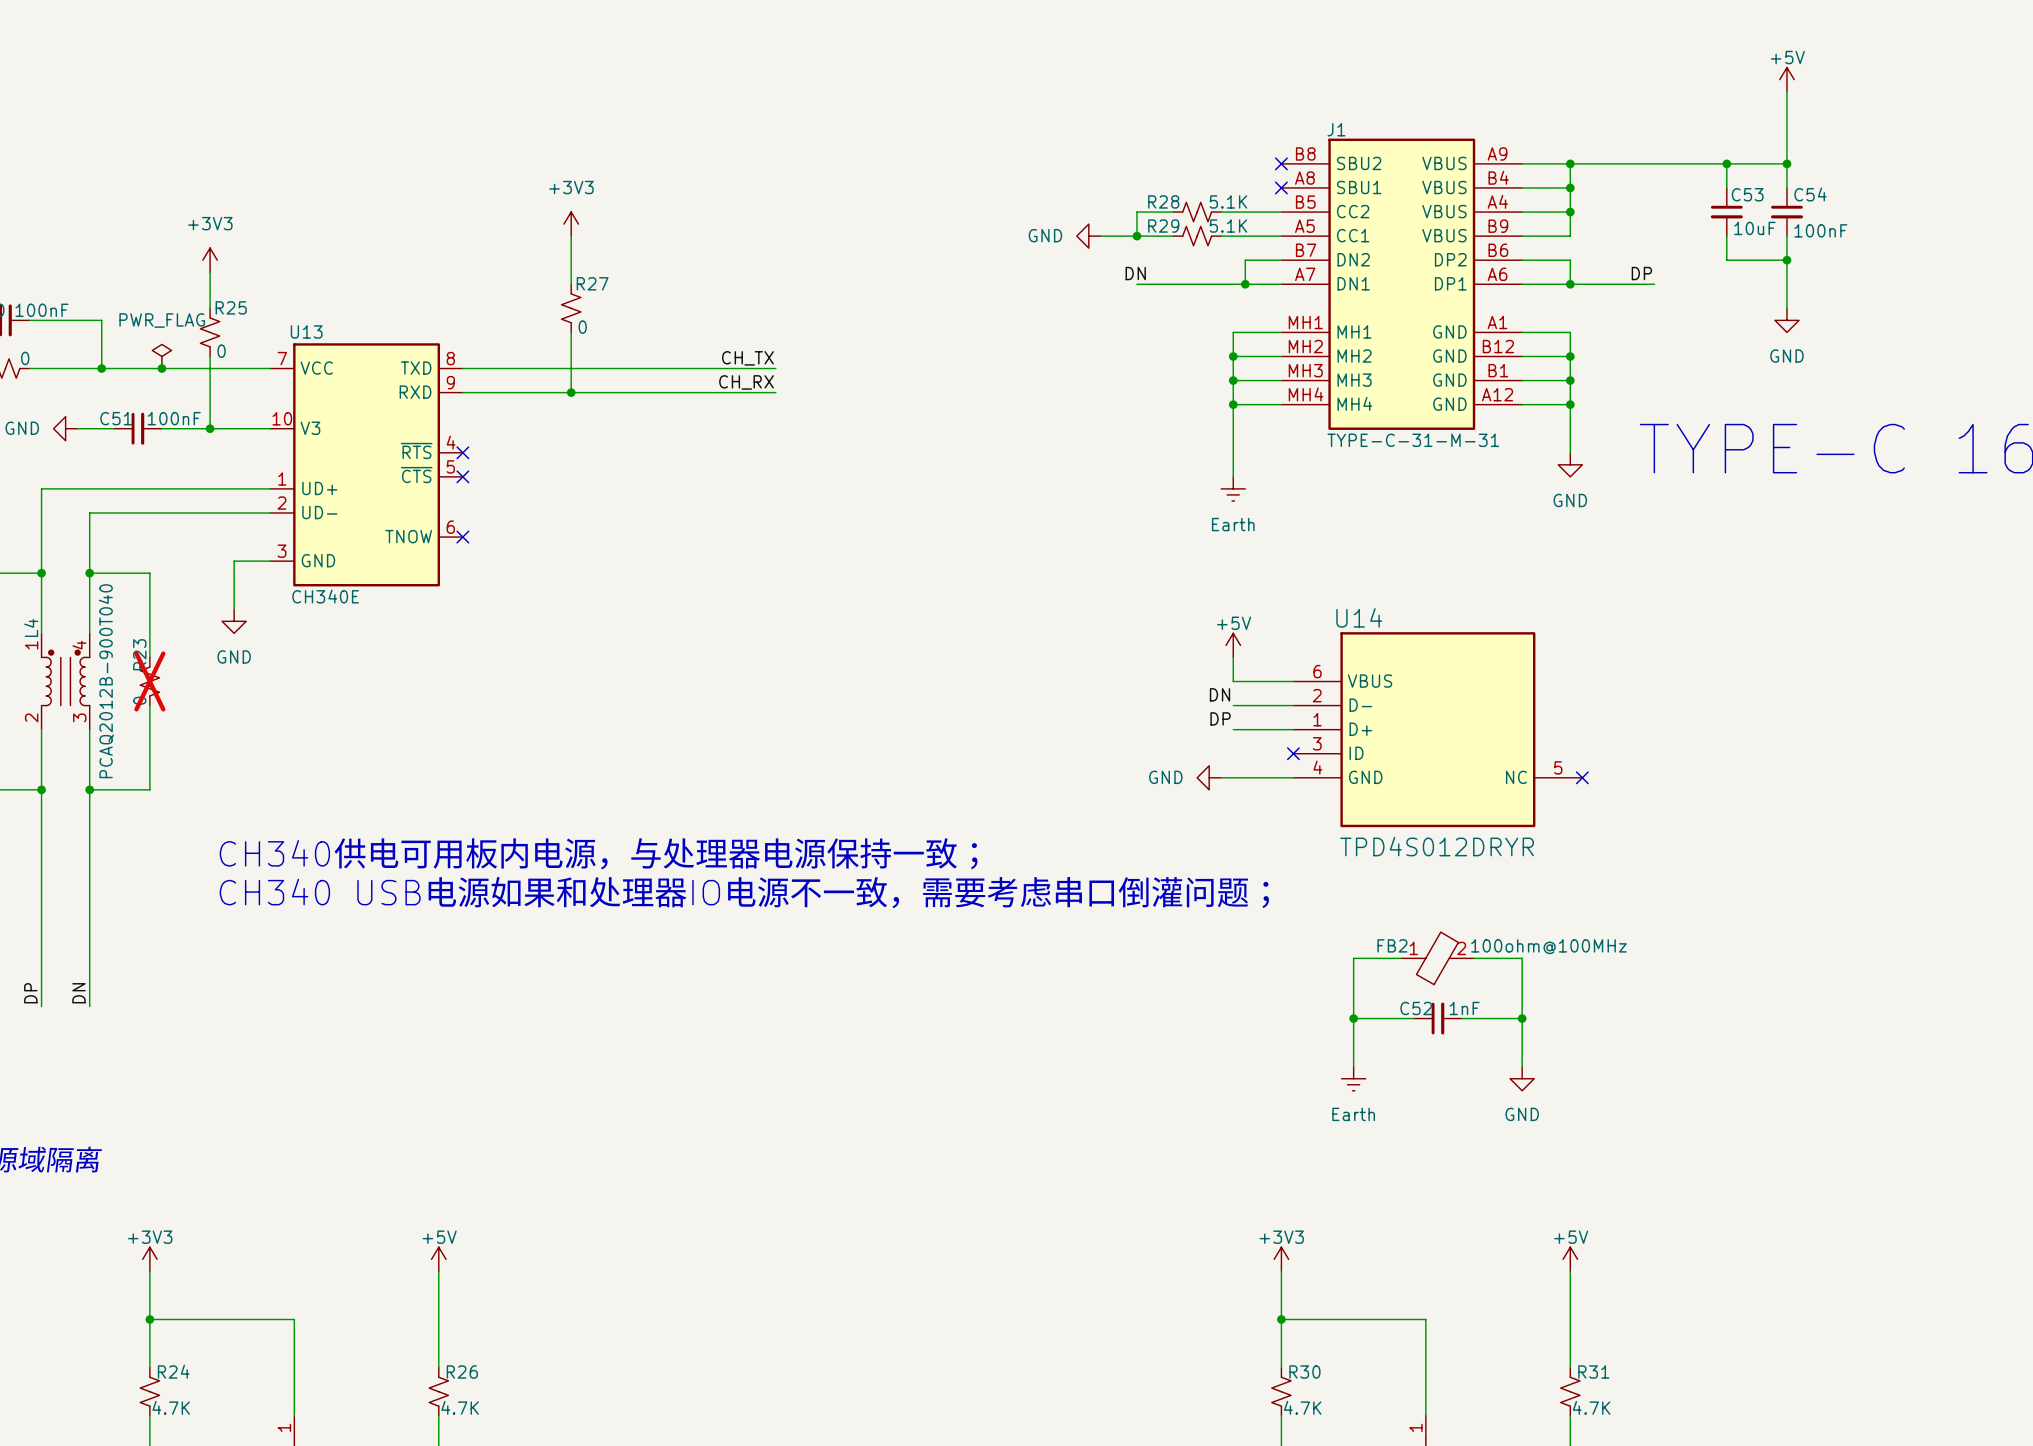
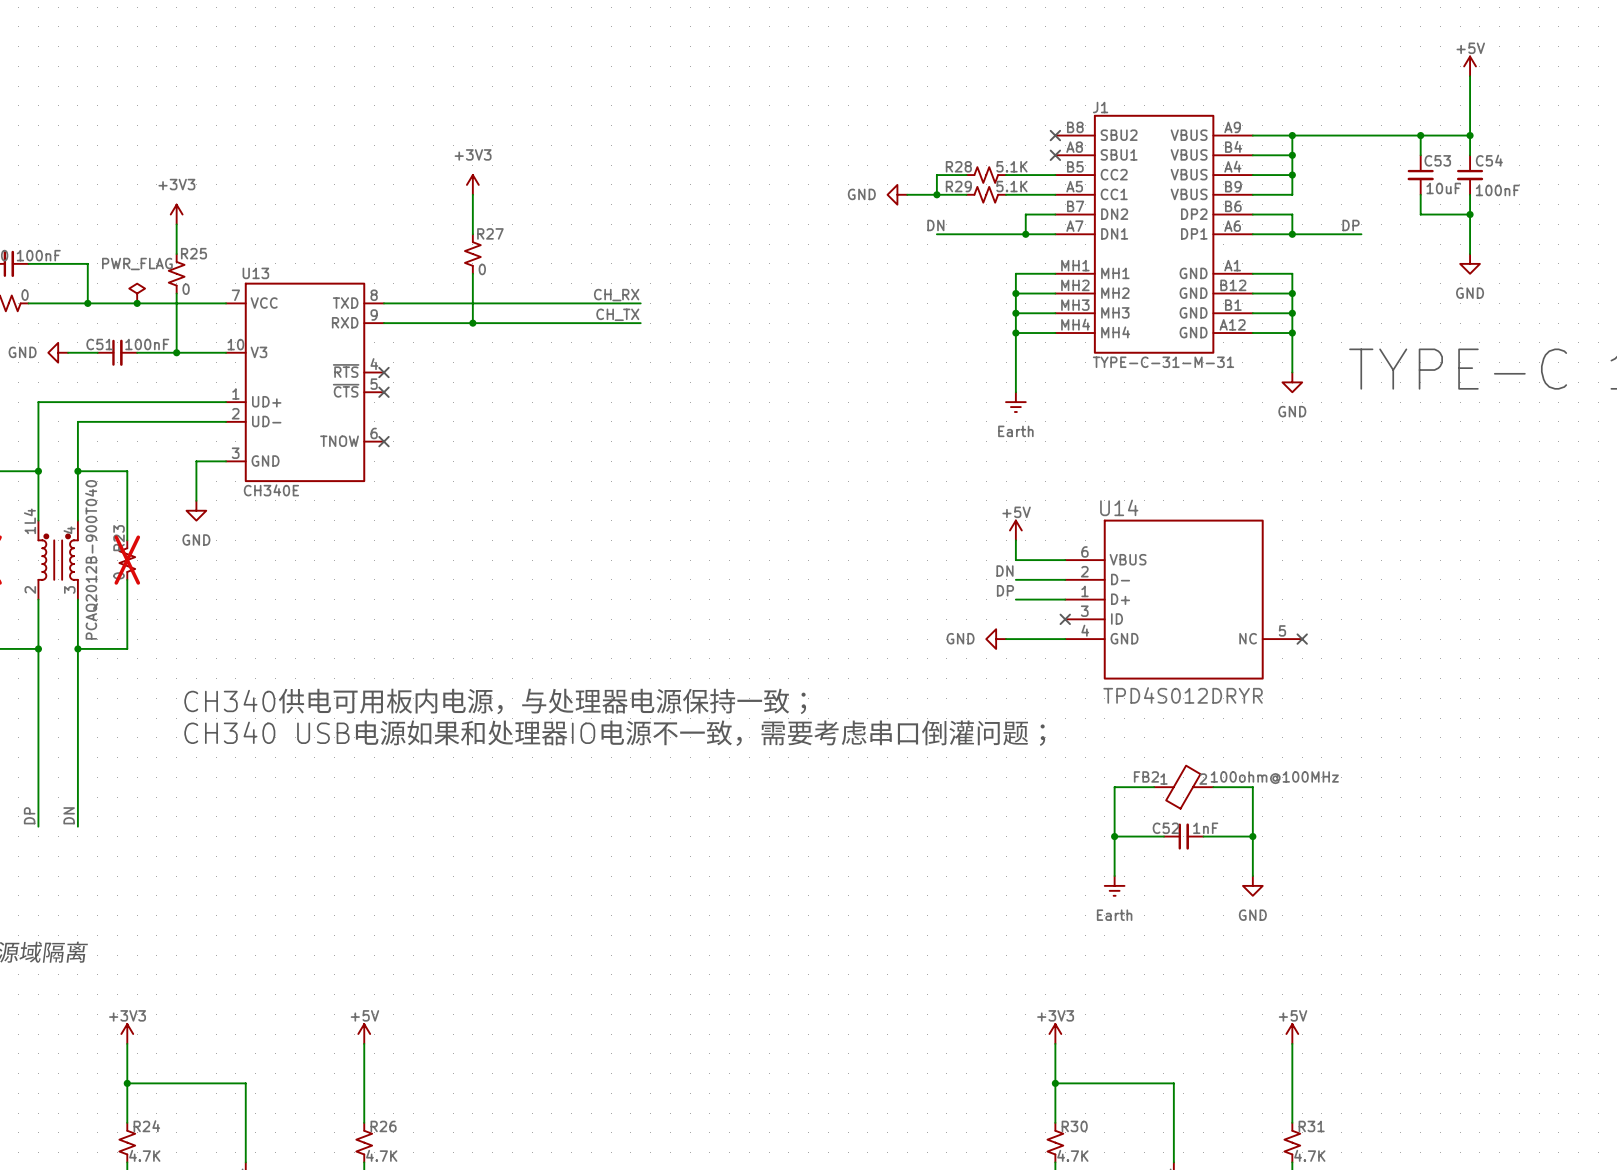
label: CH_TX (747, 358) -> CH_RX (616, 295)
label: CH_RX (746, 382) -> CH_TX (617, 314)

